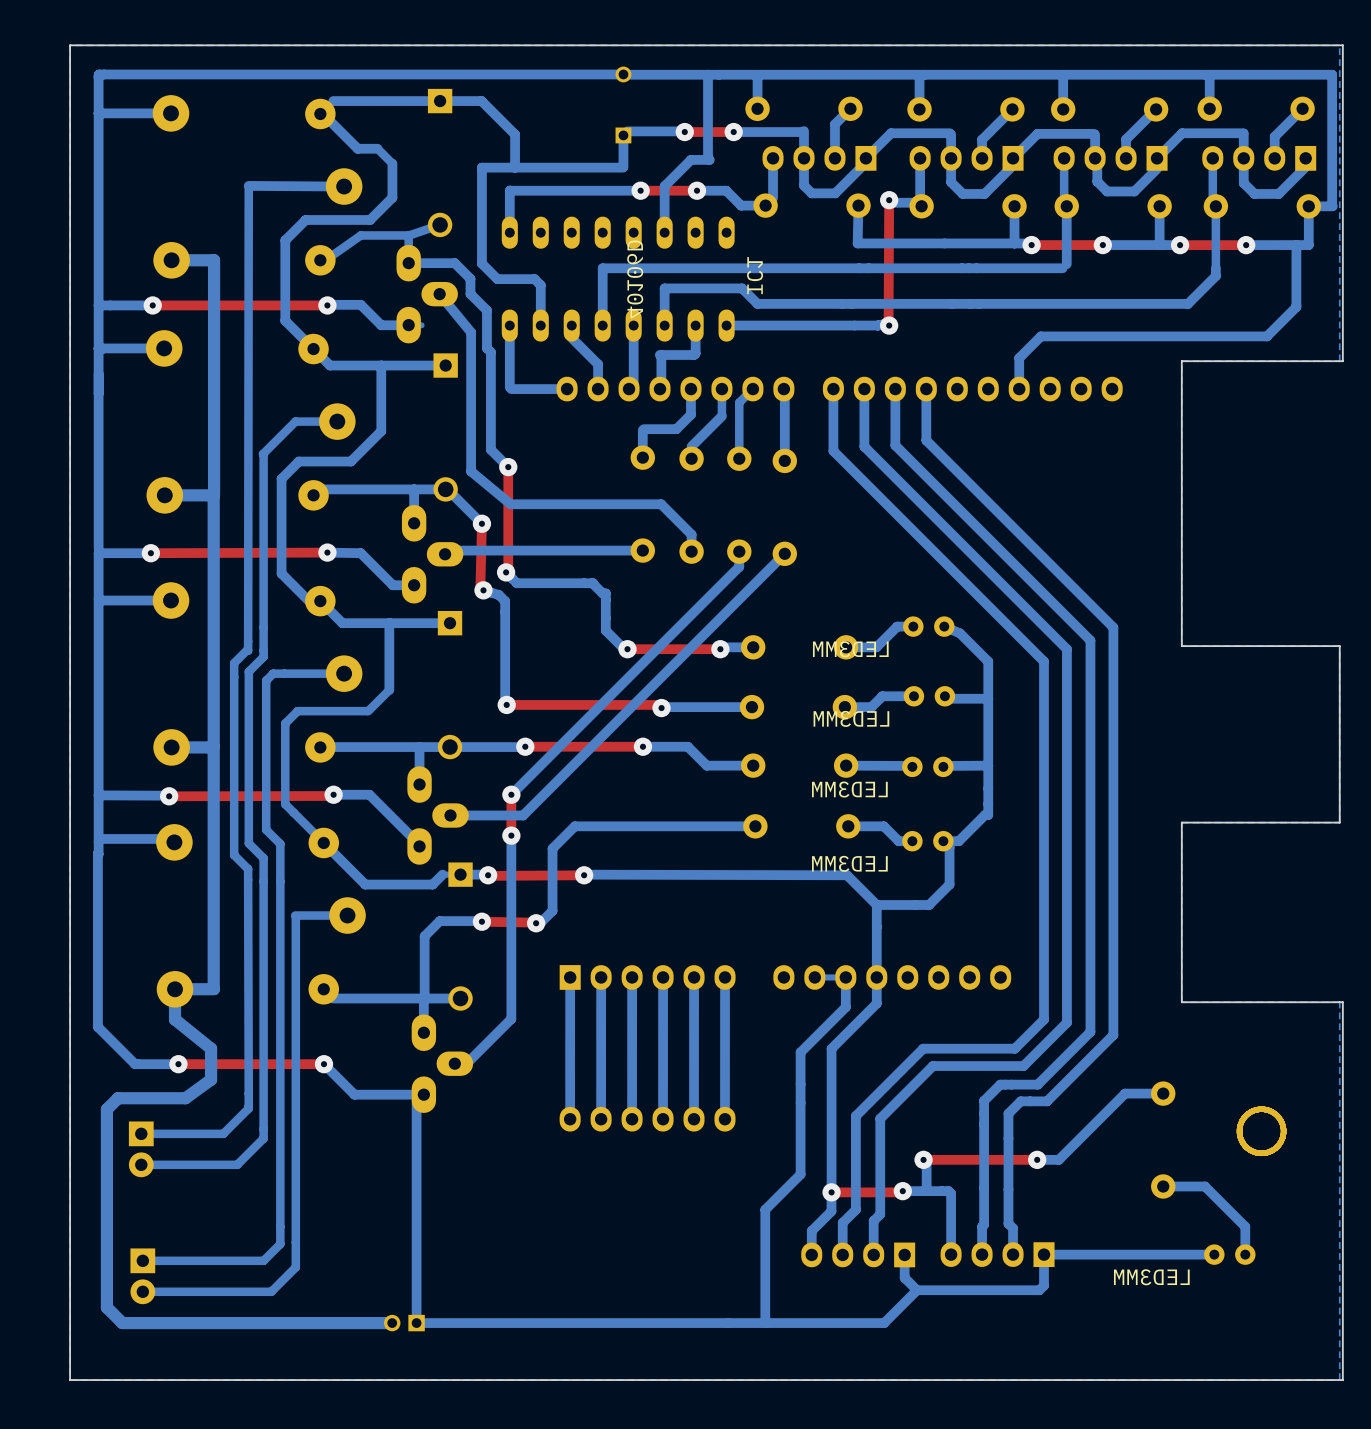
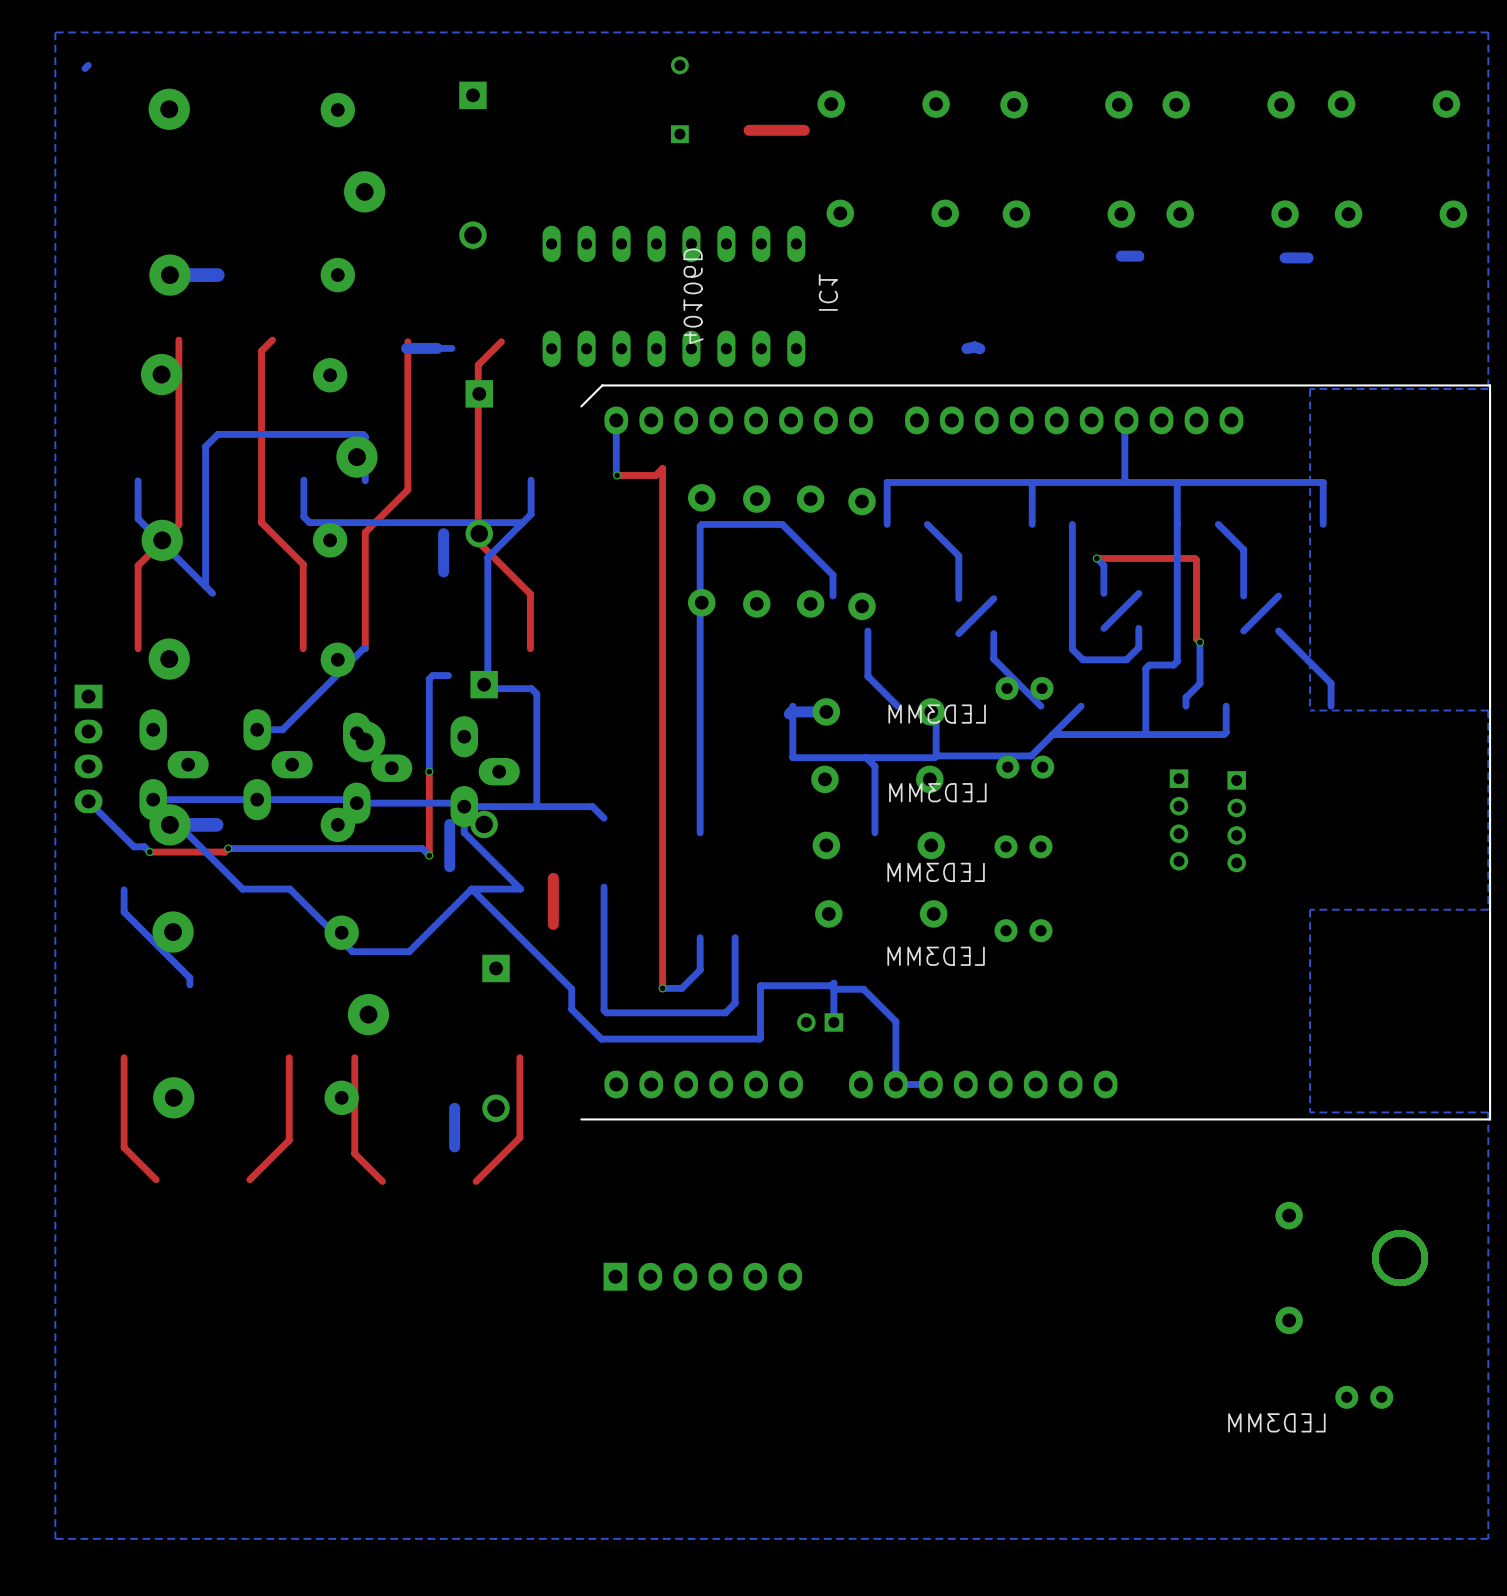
board edge: (1342, 45) (1342, 361) (1181, 361) (1181, 646) (1339, 646) (1339, 822) (1181, 822) (1181, 1002) (1342, 1002) (1342, 1380) (70, 1380) (70, 45) (1342, 45) -> none
bottom track: (708, 74) (708, 158) (709, 159) (690, 159) (664, 186) (664, 232) -> none
bottom track: (754, 74) (757, 77) (757, 108) -> none
bottom track: (924, 74) (919, 79) (919, 109) -> none
bottom track: (1062, 74) (1063, 109) -> none
bottom track: (1205, 74) (1212, 74) (1209, 77) (1209, 108) -> none
bottom track: (850, 108) (834, 124) (834, 158) -> none
bottom track: (1302, 108) (1274, 136) (1274, 158) -> none
bottom track: (1012, 109) (982, 139) (982, 158) -> none
bottom track: (1156, 109) (1126, 139) (1126, 158) -> none
bottom track: (171, 113) (98, 113) -> none
bottom track: (684, 132) (627, 131) (623, 135) (622, 167) (481, 167) (481, 263) (497, 279) (534, 279) (540, 285) (540, 325) -> none
via: (684, 132) -> none
bottom track: (733, 132) (804, 131) (804, 185) (811, 193) (835, 193) (865, 162) (865, 158) (891, 133) (949, 133) (951, 182) (962, 193) (984, 193) (1013, 165) (1013, 158) (1037, 133) (1094, 133) (1097, 181) (1107, 191) (1134, 191) (1157, 168) (1157, 158) (1182, 133) (1243, 133) (1243, 183) (1254, 193) (1278, 193) (1305, 167) (1305, 158) -> none
via: (733, 132) -> none
bottom track: (773, 158) (773, 198) (765, 205) (741, 205) (726, 190) (697, 190) -> none
part: (819, 158) -> none
bottom track: (920, 158) (920, 204) (921, 206) (921, 202) (889, 202) (889, 200) -> none
part: (966, 158) -> none
bottom track: (1064, 158) (1066, 264) (1062, 268) (602, 268) (602, 325) -> none
part: (1110, 158) -> none
bottom track: (1212, 158) (1212, 203) (1215, 206) (1215, 276) (1188, 303) (757, 303) (742, 288) (664, 288) (664, 325) -> none
part: (1259, 158) -> none
bottom track: (515, 167) (515, 134) (481, 101) (333, 101) (320, 113) (322, 113) (357, 148) (377, 148) (392, 163) (392, 197) (370, 219) (305, 219) (285, 240) (285, 320) (330, 365) (445, 365) -> none
bottom track: (344, 186) (248, 185) (248, 650) (234, 663) (234, 855) (248, 869) (248, 1108) (223, 1133) (141, 1133) -> none
bottom track: (640, 190) (509, 190) (509, 232) -> none
via: (640, 190) -> none
top track: (697, 190) (640, 190) -> none
via: (697, 190) -> none
top track: (889, 200) (889, 325) -> none
via: (889, 200) -> none
bottom track: (858, 205) (857, 243) (1014, 243) (1014, 206) -> none
bottom track: (1159, 206) (1159, 245) -> none
bottom track: (440, 224) (409, 235) -> none
bottom track: (409, 235) (408, 263) (454, 263) (470, 278) (470, 293) (486, 310) (486, 348) (490, 352) (490, 449) (508, 467) -> none
bottom track: (409, 235) (360, 235) (325, 260) (320, 260) -> none
via: (1031, 245) -> none
top track: (1102, 245) (1031, 245) -> none
via: (1102, 245) -> none
bottom track: (1159, 245) (1102, 245) -> none
via: (1180, 245) -> none
top track: (1246, 245) (1180, 245) -> none
via: (1246, 245) -> none
bottom track: (1296, 245) (1296, 307) (1266, 336) (1040, 336) (1019, 358) (1019, 389) -> none
bottom track: (1296, 245) (1308, 245) (1308, 206) (1332, 206) (1332, 74) (99, 74) (98, 553) -> none
bottom track: (1296, 245) (1246, 245) -> none
bottom track: (214, 260) (213, 495) -> none
part: (427, 294) -> none
bottom track: (439, 294) (471, 332) (471, 471) (510, 504) (661, 504) (691, 534) (691, 551) -> none
bottom track: (152, 305) (98, 305) -> none
via: (152, 305) -> none
bottom track: (327, 305) (360, 304) (381, 325) -> none
top track: (327, 305) (152, 305) -> none
via: (327, 305) -> none
top track: none -> (178, 340) (178, 524) (138, 565) (138, 648)
top track: none -> (272, 340) (261, 351) (261, 522) (303, 564) (303, 648)
top track: none -> (407, 341) (407, 489) (365, 532) (365, 648)
top track: none -> (501, 341) (478, 364) (478, 541) (530, 594) (530, 648)
bottom track: (509, 325) (509, 387) (511, 389) (567, 389) -> (617, 475) (616, 420)
bottom track: (571, 325) (571, 337) (598, 364) (598, 389) -> none
bottom track: (633, 325) (633, 384) (629, 389) -> none
bottom track: (695, 325) (694, 355) (659, 355) (661, 355) (661, 389) -> none
bottom track: (878, 325) (726, 325) -> none
via: (889, 325) -> none
bottom track: (164, 348) (99, 348) -> none
bottom track: (381, 365) (381, 431) (350, 461) (298, 461) (281, 478) (281, 573) (309, 601) (320, 601) (342, 623) (450, 623) -> none
board edge: none -> (581, 406) (602, 385) (1490, 385) (1490, 1119) (581, 1119)
bottom track: (690, 389) (690, 414) (676, 429) (642, 430) (642, 457) -> none
bottom track: (721, 389) (721, 416) (691, 446) (691, 458) -> none
bottom track: (752, 389) (739, 402) (739, 458) -> none
bottom track: (783, 389) (784, 460) -> none
bottom track: (833, 389) (833, 451) (1044, 661) (1044, 1019) (1014, 1048) (923, 1048) (855, 1116) (855, 1209) (842, 1222) (842, 1254) -> none
bottom track: (864, 389) (864, 446) (1066, 649) (1066, 1022) (1023, 1066) (932, 1066) (880, 1118) (880, 1214) (873, 1220) (873, 1254) -> none
bottom track: (895, 389) (895, 445) (1090, 640) (1090, 1031) (1037, 1084) (1000, 1084) (984, 1100) (984, 1224) (982, 1226) (982, 1254) -> none
bottom track: (926, 389) (926, 440) (1113, 627) (1113, 1035) (1047, 1101) (1020, 1101) (1008, 1113) (1008, 1223) (1013, 1228) (1013, 1254) -> none
bottom track: none -> (1124, 422) (1124, 482)
bottom track: (337, 421) (295, 421) (263, 454) (263, 656) (248, 671) (248, 843) (263, 858) (263, 1138) (237, 1164) (141, 1164) -> none
top track: none -> (617, 475) (655, 475) (662, 468) (662, 988)
via: none -> (617, 475)
bottom track: none -> (138, 480) (138, 518) (212, 593)
bottom track: none -> (303, 480) (303, 516) (309, 522) (522, 522)
bottom track: none -> (365, 480) (365, 436) (362, 434) (217, 434) (205, 446) (205, 586)
bottom track: none -> (531, 480) (531, 514) (487, 557) (487, 688) (531, 688) (536, 693) (536, 806)
bottom track: none -> (1030, 482) (1032, 484) (1032, 524)
bottom track: none -> (1177, 482) (1177, 661) (1173, 665) (1149, 665) (1145, 668) (1145, 734)
top track: (508, 467) (508, 570) (506, 572) -> none
via: (508, 467) -> none
bottom track: none -> (927, 524) (958, 555) (958, 598)
bottom track: none -> (1072, 524) (1072, 649) (1082, 659) (1126, 659) (1138, 647) (1138, 628)
bottom track: none -> (1218, 524) (1243, 549) (1243, 596)
bottom track: none -> (1323, 524) (1323, 482) (887, 482) (887, 524)
bottom track: (213, 495) (214, 989) (175, 989) -> none
bottom track: (213, 495) (164, 495) -> none
bottom track: (313, 495) (319, 489) (447, 489) (481, 523) -> none
bottom track: none -> (1096, 558) (1103, 565) (1103, 593)
top track: none -> (1096, 558) (1194, 558) (1196, 560) (1196, 638) (1199, 642)
via: none -> (1096, 558)
top track: (481, 523) (480, 587) (483, 590) -> none
via: (481, 523) -> none
bottom track: none -> (1138, 593) (1103, 628)
bottom track: none -> (832, 596) (832, 575) (782, 524) (701, 524) (700, 526) (700, 832)
bottom track: none -> (1278, 596) (1243, 630)
bottom track: none -> (993, 598) (958, 633)
bottom track: (642, 550) (448, 550) (445, 554) -> none
bottom track: (739, 551) (739, 566) (511, 794) -> none
bottom track: (327, 552) (360, 553) (392, 585) (414, 585) -> none
top track: (327, 552) (150, 553) -> none
via: (327, 552) -> none
bottom track: (98, 553) (97, 1027) (135, 1064) (178, 1064) -> none
bottom track: (150, 553) (98, 553) -> none
via: (150, 553) -> none
bottom track: (784, 553) (523, 815) (450, 815) -> none
part: (432, 554) -> none
bottom track: (506, 572) (516, 583) (593, 583) -> none
via: (506, 572) -> none
bottom track: none -> (867, 630) (867, 676) (897, 706)
bottom track: none -> (1278, 630) (1331, 683) (1331, 706)
bottom track: none -> (993, 633) (993, 658) (1040, 706)
bottom track: (592, 583) (602, 593) (605, 593) (605, 630) (624, 649) (627, 649) (624, 646) -> none
bottom track: none -> (1199, 642) (1199, 683) (1186, 697) (1186, 706)
via: none -> (1199, 642)
bottom track: (483, 590) (498, 595) (505, 601) (505, 703) (506, 704) -> none
via: (483, 590) -> none
bottom track: none -> (365, 648) (282, 729) (257, 729)
bottom track: (98, 598) (100, 600) (171, 600) -> none
bottom track: none -> (448, 675) (432, 675) (429, 679) (429, 771)
bottom track: (389, 623) (389, 690) (368, 711) (297, 711) (285, 723) (285, 804) (365, 884) (432, 884) (442, 874) (488, 875) -> none
bottom track: (913, 626) (897, 626) (876, 647) (846, 647) -> none
bottom track: (944, 626) (960, 633) (988, 661) (988, 814) (985, 814) (958, 841) (943, 841) (949, 847) (949, 884) (929, 905) (876, 905) -> none
bottom track: none -> (792, 706) (792, 757) (934, 757) (936, 755)
bottom track: none -> (936, 706) (936, 755)
bottom track: none -> (1081, 706) (1031, 755) (936, 755)
bottom track: none -> (1226, 706) (1226, 732) (1224, 734) (1052, 734)
via: (627, 649) -> none
top track: (720, 649) (627, 649) -> none
via: (720, 649) -> none
bottom track: (344, 673) (273, 673) (266, 680) (266, 829) (280, 843) (280, 1244) (263, 1260) (142, 1260) -> none
part: none -> (88, 748)
bottom track: none -> (866, 757) (874, 766) (874, 832)
part: none -> (174, 764)
part: none -> (278, 764)
bottom track: (913, 696) (882, 696) (871, 707) (844, 707) -> none
bottom track: (944, 696) (947, 698) (988, 698) -> none
part: none -> (377, 768)
top track: none -> (429, 771) (429, 855)
via: none -> (429, 771)
part: none -> (485, 771)
top track: (506, 704) (658, 704) (661, 708) -> none
via: (506, 704) -> none
bottom track: (751, 707) (661, 708) -> none
via: (661, 708) -> none
bottom track: none -> (88, 801) (133, 846) (144, 846) (149, 852)
bottom track: none -> (464, 806) (592, 806) (604, 818)
bottom track: none -> (464, 806) (460, 803) (356, 803) (353, 799) (153, 799) (242, 889) (289, 889) (352, 951) (409, 951) (471, 889)
bottom track: none -> (464, 806) (464, 832) (520, 889) (471, 889)
part: none -> (1179, 819)
part: none -> (1236, 821)
bottom track: (525, 746) (320, 747) -> none
via: (525, 746) -> none
bottom track: (642, 746) (687, 746) (706, 765) (753, 765) -> none
top track: (642, 746) (525, 746) -> none
via: (642, 746) -> none
bottom track: (846, 765) (912, 766) -> none
bottom track: (988, 765) (943, 766) -> none
bottom track: none -> (228, 848) (422, 848) (429, 855)
top track: none -> (228, 848) (224, 852) (149, 852)
via: none -> (228, 848)
via: none -> (149, 852)
via: none -> (429, 855)
bottom track: (333, 794) (369, 794) (419, 846) -> none
top track: (333, 794) (169, 796) -> none
via: (333, 794) -> none
via: (511, 794) -> none
bottom track: (98, 795) (169, 796) -> none
via: (169, 796) -> none
bottom track: none -> (604, 887) (604, 1010) (606, 1012) (725, 1012) (735, 1003) (735, 937)
bottom track: none -> (124, 889) (124, 912) (189, 977) (189, 984)
bottom track: none -> (471, 889) (571, 989) (571, 1009) (601, 1039) (759, 1039) (760, 985) (831, 985) (833, 983) (833, 1022)
part: (438, 815) -> none
bottom track: (755, 826) (574, 826) (552, 848) (552, 910) (541, 922) (536, 923) -> none
bottom track: (848, 826) (883, 826) (898, 841) (912, 841) -> none
bottom track: (511, 835) (511, 1018) (466, 1063) (454, 1063) -> none
via: (511, 835) -> none
bottom track: (181, 838) (101, 838) (98, 841) -> none
bottom track: none -> (700, 937) (700, 970) (681, 988) (662, 988)
via: (488, 875) -> none
bottom track: (584, 875) (847, 875) (876, 905) -> none
top track: (584, 875) (488, 875) -> none
via: (584, 875) -> none
via: none -> (662, 988)
bottom track: none -> (833, 989) (863, 989) (895, 1021) (895, 1084)
bottom track: (876, 905) (876, 1003) (831, 1048) (831, 1211) (811, 1231) (811, 1254) -> none
bottom track: (347, 915) (295, 915) (295, 1267) (271, 1291) (142, 1291) -> none
bottom track: (481, 921) (439, 921) (424, 936) (424, 998) -> none
top track: (481, 921) (536, 923) -> none
via: (481, 921) -> none
part: none -> (820, 1022)
via: (536, 923) -> none
top track: none -> (124, 1057) (124, 1147) (156, 1179)
top track: none -> (289, 1057) (289, 1140) (249, 1179)
top track: none -> (354, 1057) (354, 1153) (382, 1181)
top track: none -> (519, 1057) (519, 1137) (476, 1181)
part footprint: [559, 965, 736, 990] -> [604, 1070, 803, 1099]
bottom track: (570, 977) (570, 1119) -> none
bottom track: (601, 977) (601, 1119) -> none
bottom track: (632, 977) (632, 1119) -> none
bottom track: (663, 977) (663, 1119) -> none
bottom track: (694, 977) (694, 1119) -> none
bottom track: (725, 977) (724, 1119) -> none
bottom track: (845, 977) (845, 1007) (800, 1052) (800, 1174) (765, 1209) (765, 1323) -> none
bottom track: (175, 989) (175, 1019) (211, 1048) (211, 1079) (185, 1098) (118, 1098) (106, 1109) (106, 1307) (122, 1323) (392, 1323) -> none
bottom track: (323, 989) (332, 998) (460, 998) -> none
part: (442, 1063) -> none
via: (178, 1064) -> none
bottom track: (324, 1064) (354, 1094) (423, 1094) (416, 1101) (416, 1323) (884, 1323) (917, 1290) -> none
top track: (324, 1064) (178, 1064) -> none
via: (324, 1064) -> none
bottom track: (1163, 1093) (1125, 1093) (1058, 1159) (1037, 1159) -> none
part: (647, 1119) -> none
part: none -> (702, 1276)
part: (141, 1149) -> none
bottom track: (923, 1159) (926, 1162) (926, 1191) -> none
via: (923, 1159) -> none
top track: (1037, 1159) (923, 1159) -> none
via: (1037, 1159) -> none
bottom track: (1163, 1186) (1205, 1186) (1245, 1226) (1245, 1254) -> none
bottom track: (902, 1191) (948, 1191) (951, 1193) (951, 1254) -> none
top track: (902, 1191) (831, 1192) -> none
via: (902, 1191) -> none
via: (831, 1192) -> none
part: (858, 1254) -> none
bottom track: (904, 1254) (904, 1277) (917, 1290) -> none
part: (997, 1254) -> none
bottom track: (1214, 1254) (1044, 1254) (1044, 1285) (1039, 1290) (917, 1290) -> none
part: (142, 1276) -> none
part: (404, 1323) -> none

